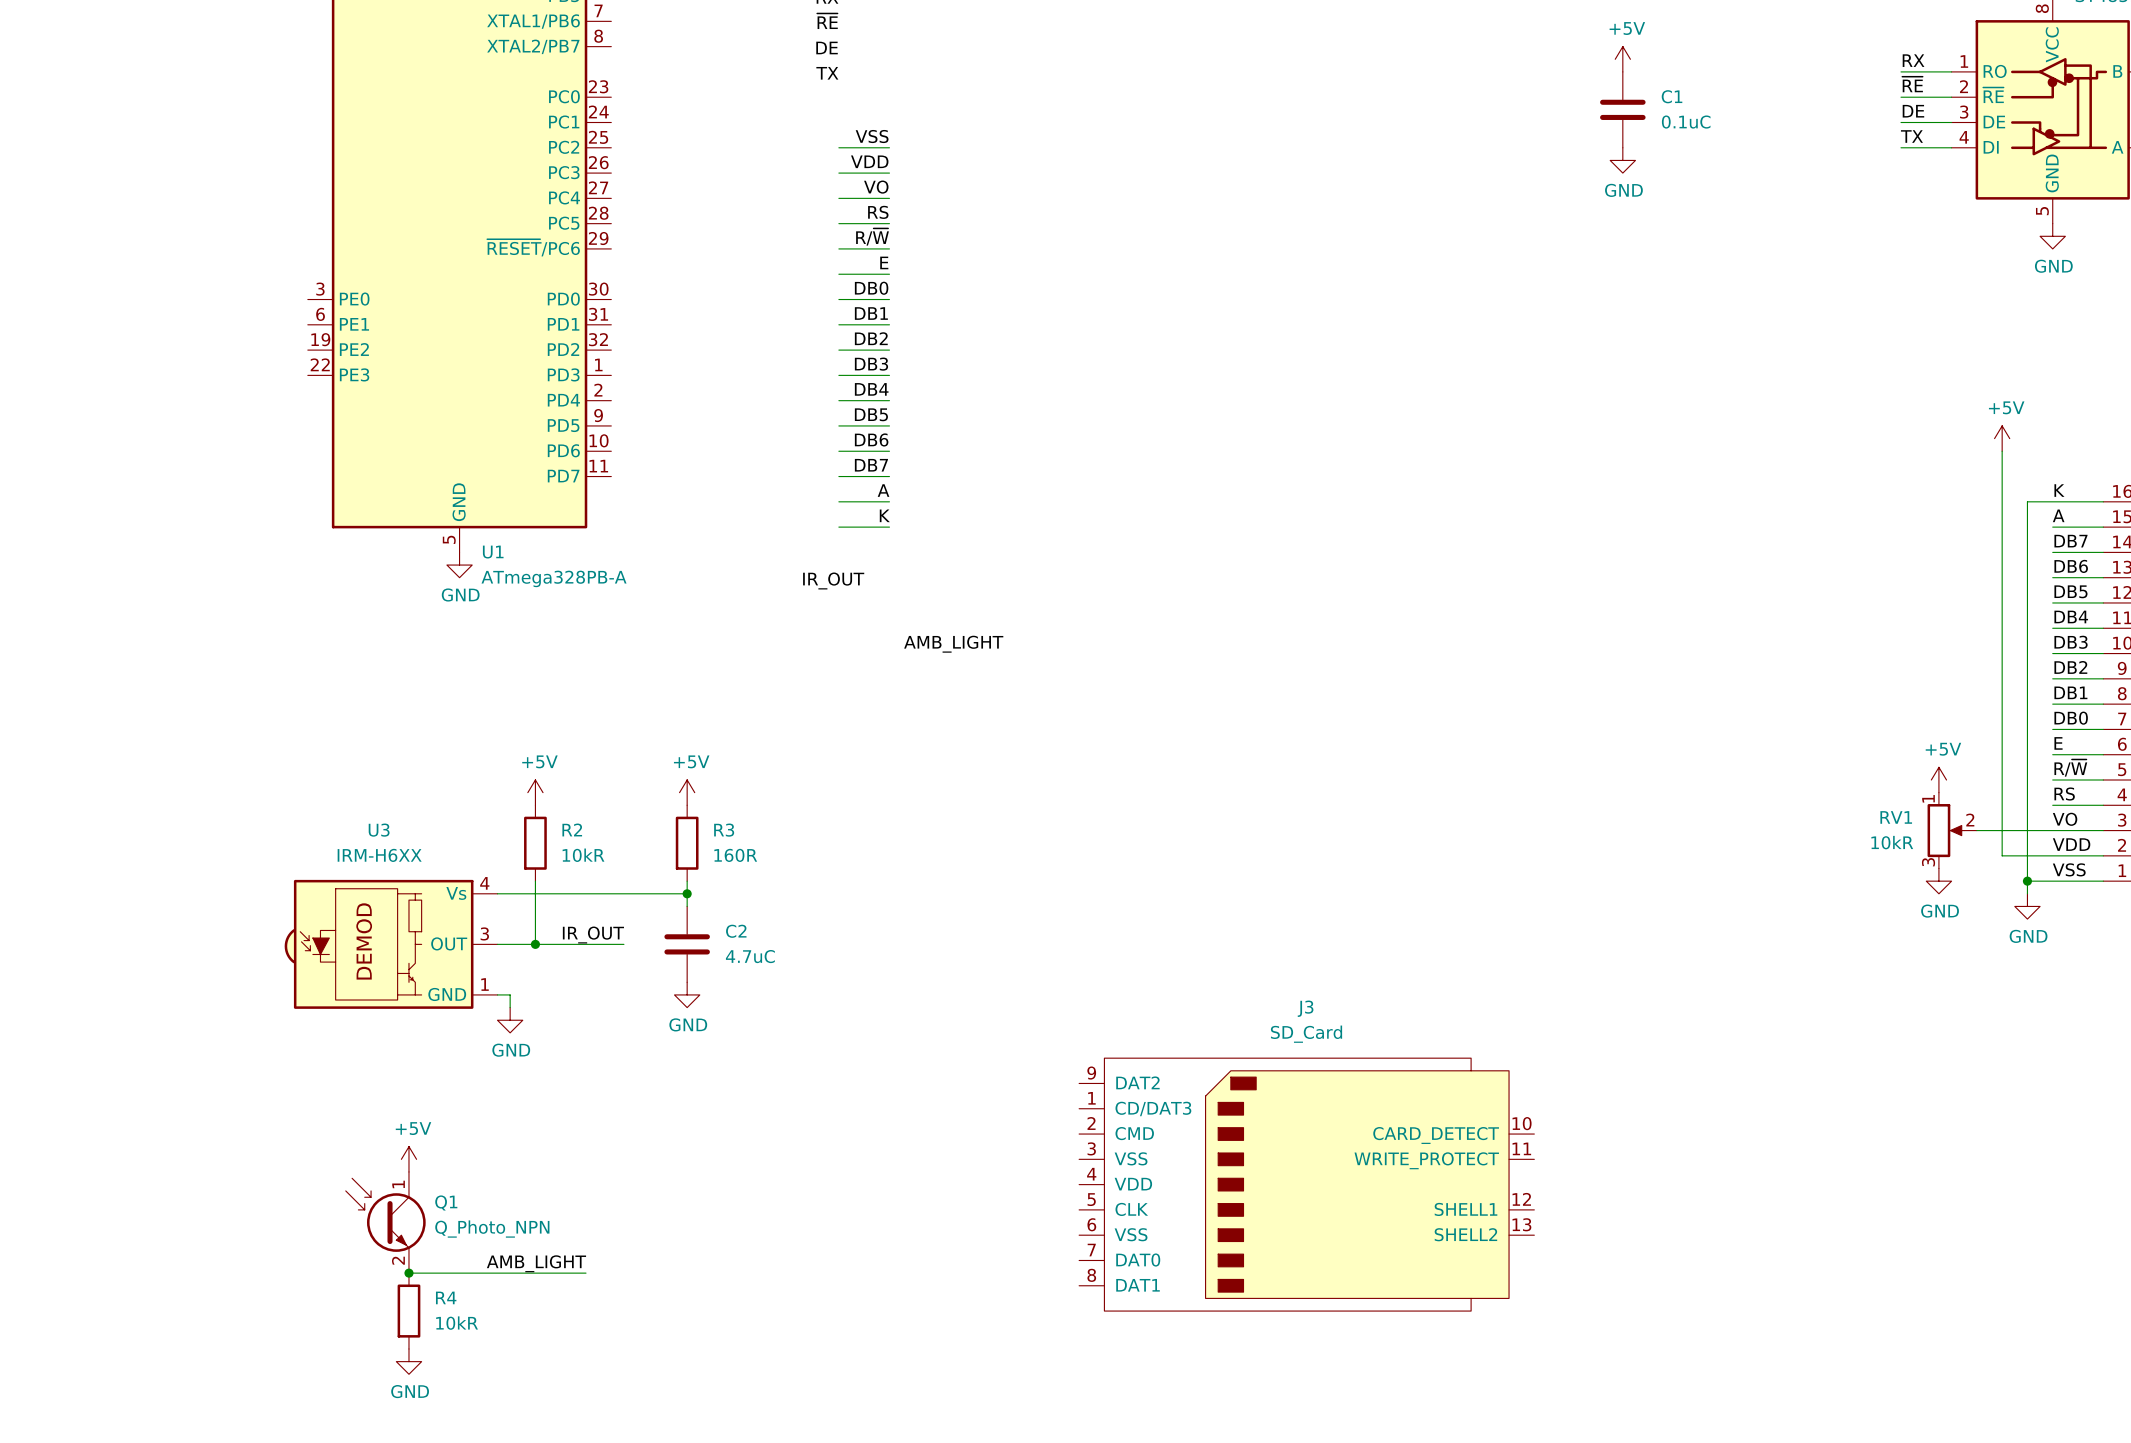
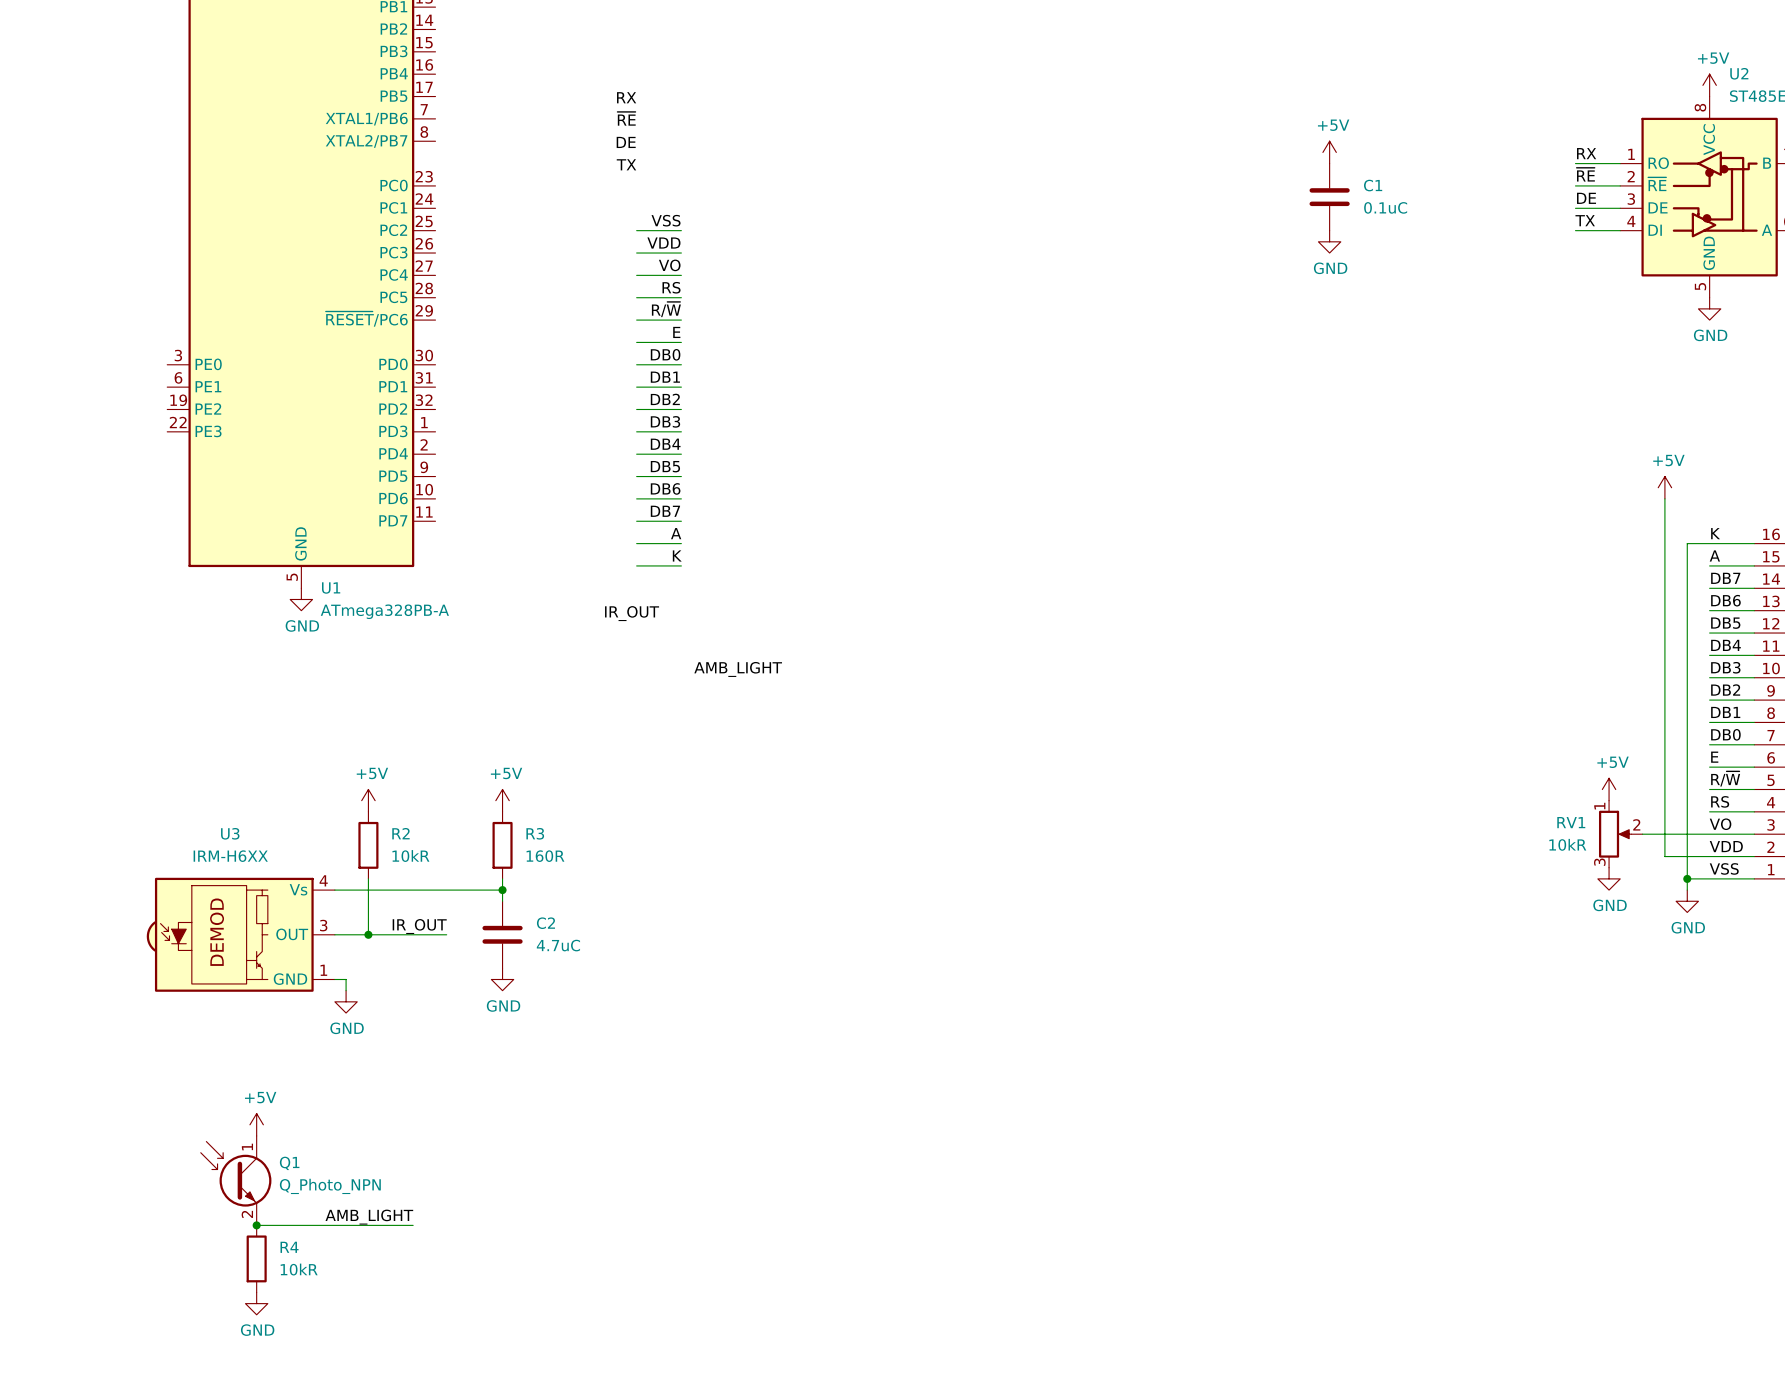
J3: SD_Card (1306, 1184) -> none

